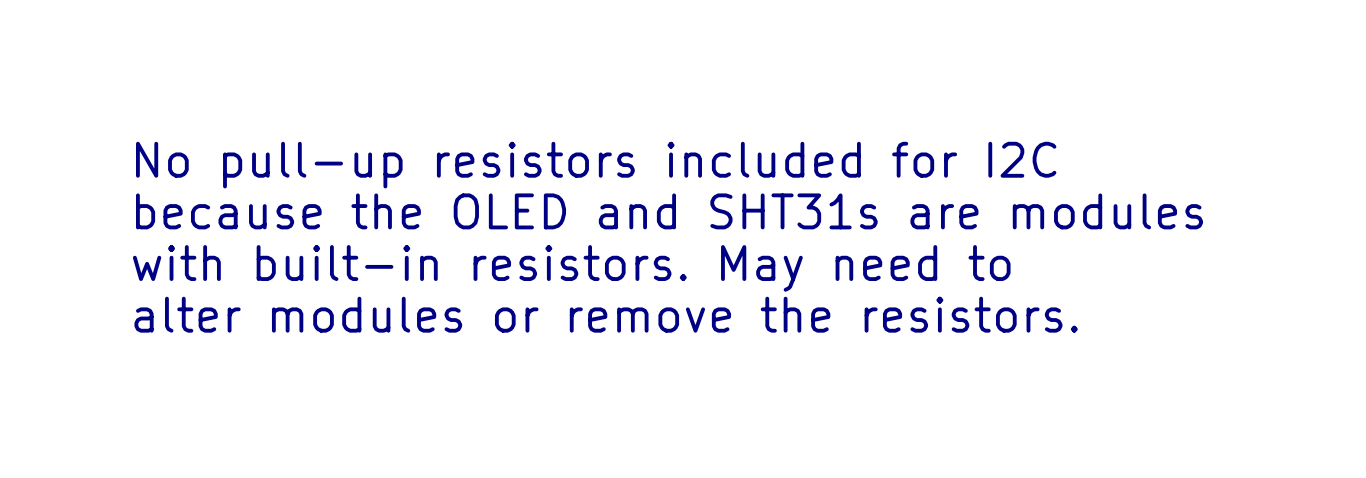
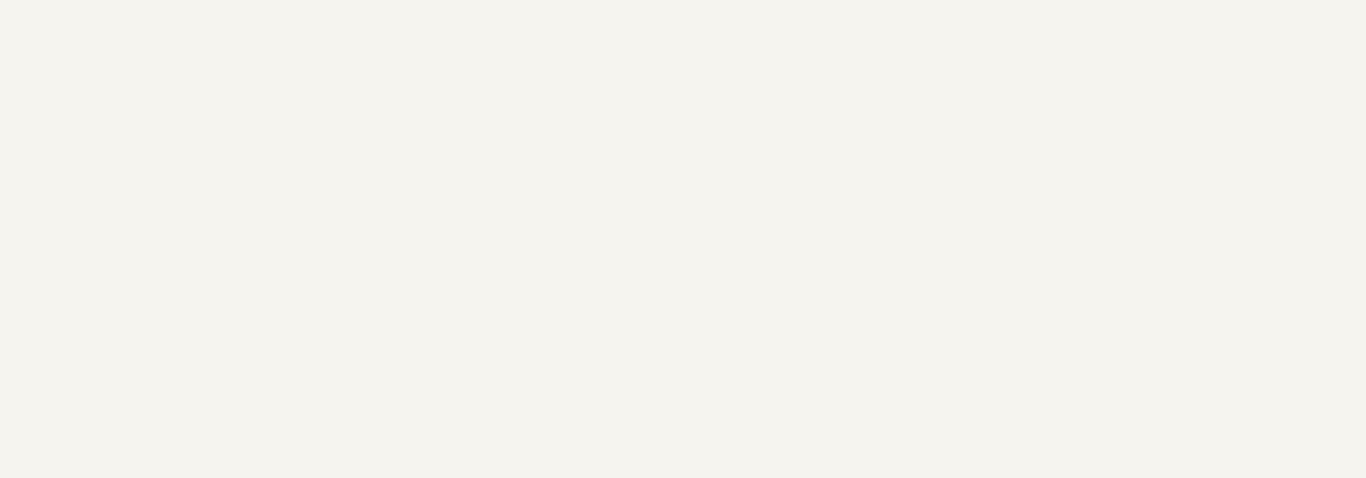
text: No pull-up resistors included for I2C (596, 165) -> none
text: because the OLED and SHT31s are modules (669, 211) -> none
text: with built-in resistors. May need to (571, 268) -> none
text: alter modules or remove the resistors. (606, 314) -> none

